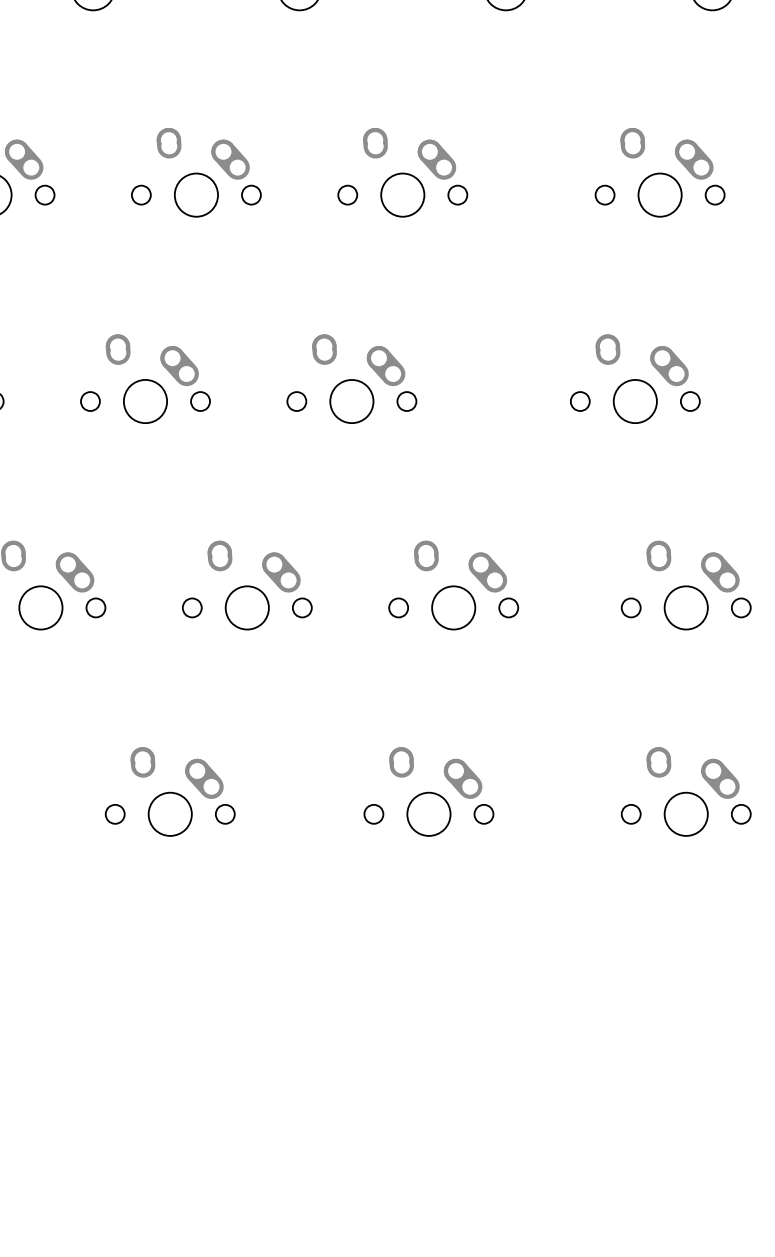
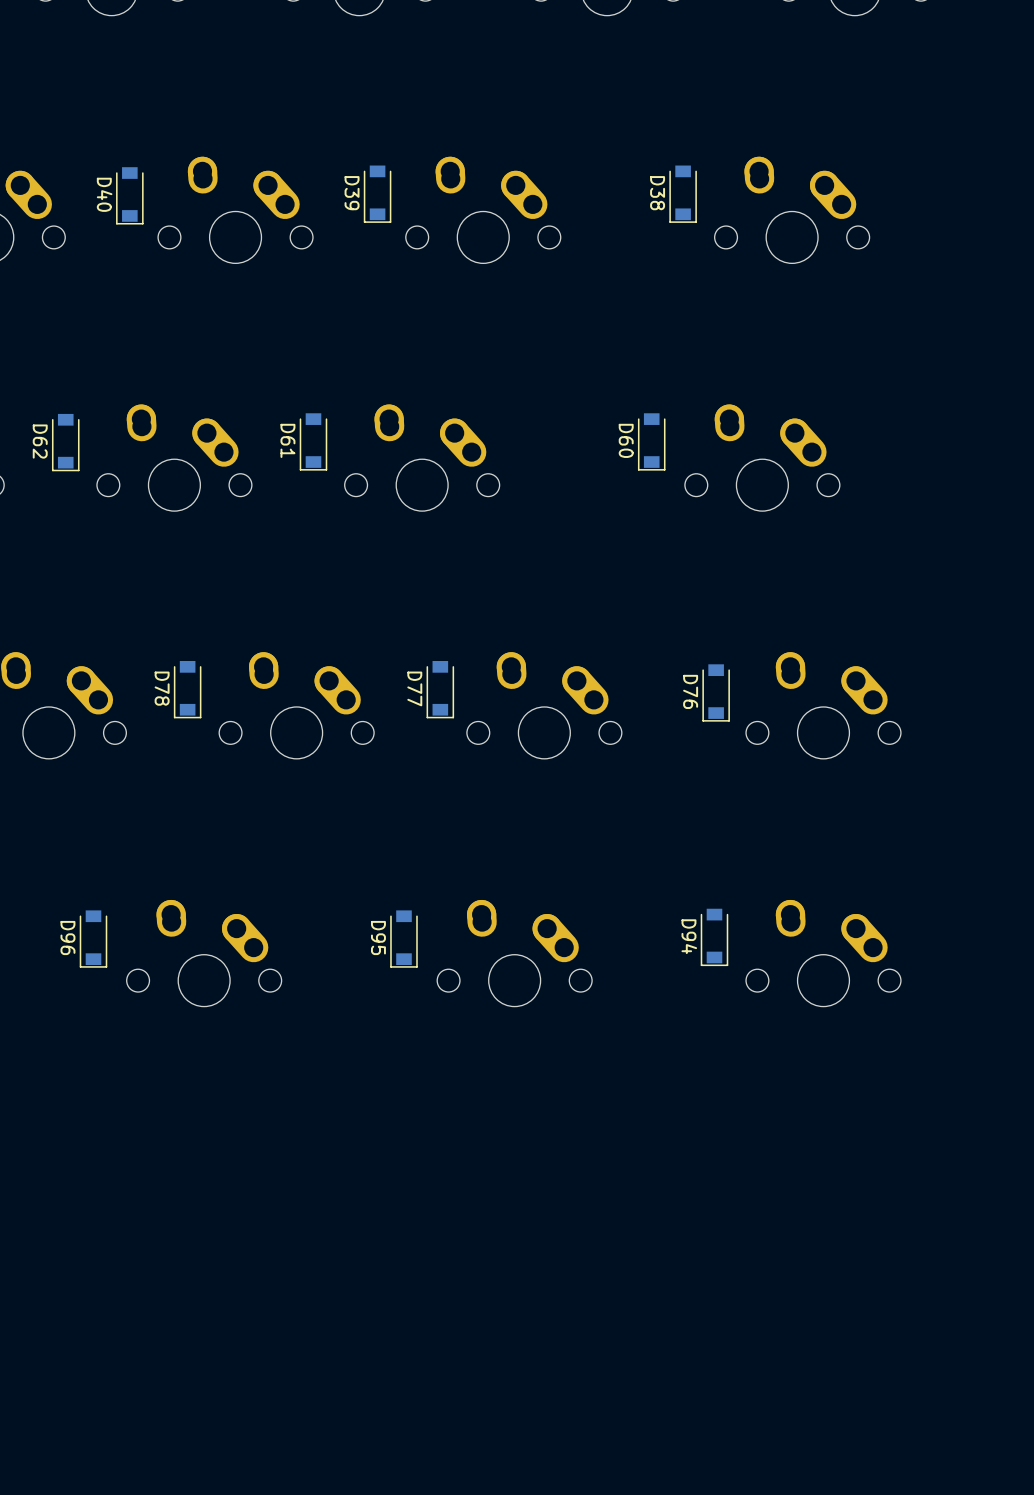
D39: none -> (377, 194)
D38: none -> (683, 194)
D40: none -> (129, 195)
D61: none -> (313, 441)
D60: none -> (651, 441)
D62: none -> (65, 442)
D78: none -> (187, 689)
D77: none -> (440, 689)
D76: none -> (716, 692)
D94: none -> (714, 937)
D96: none -> (93, 939)
D95: none -> (403, 939)

